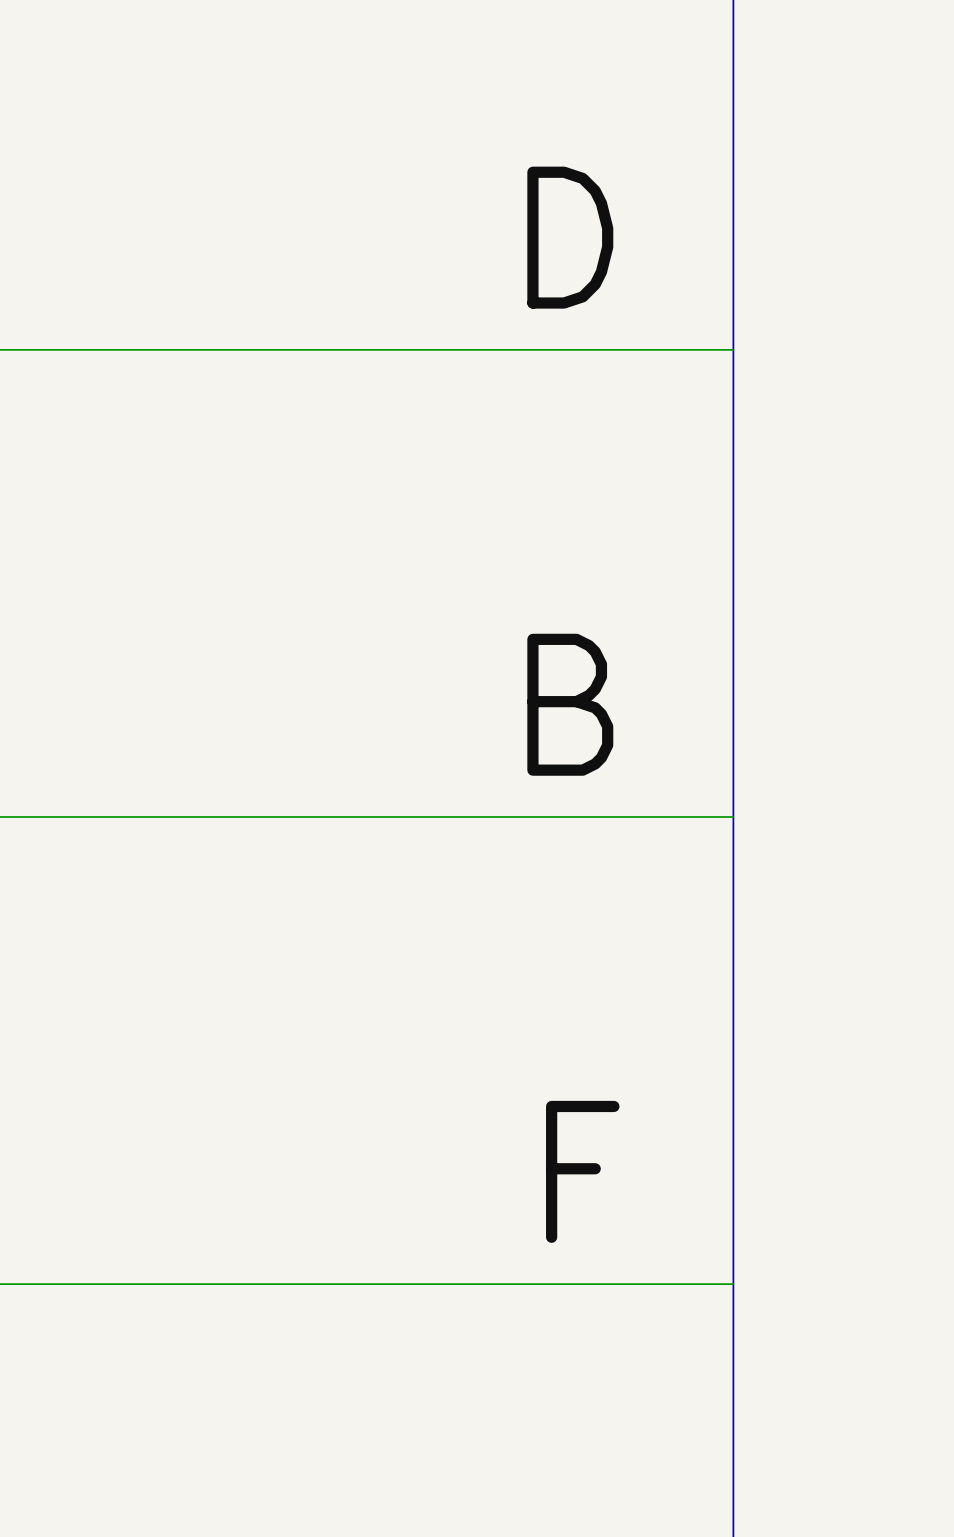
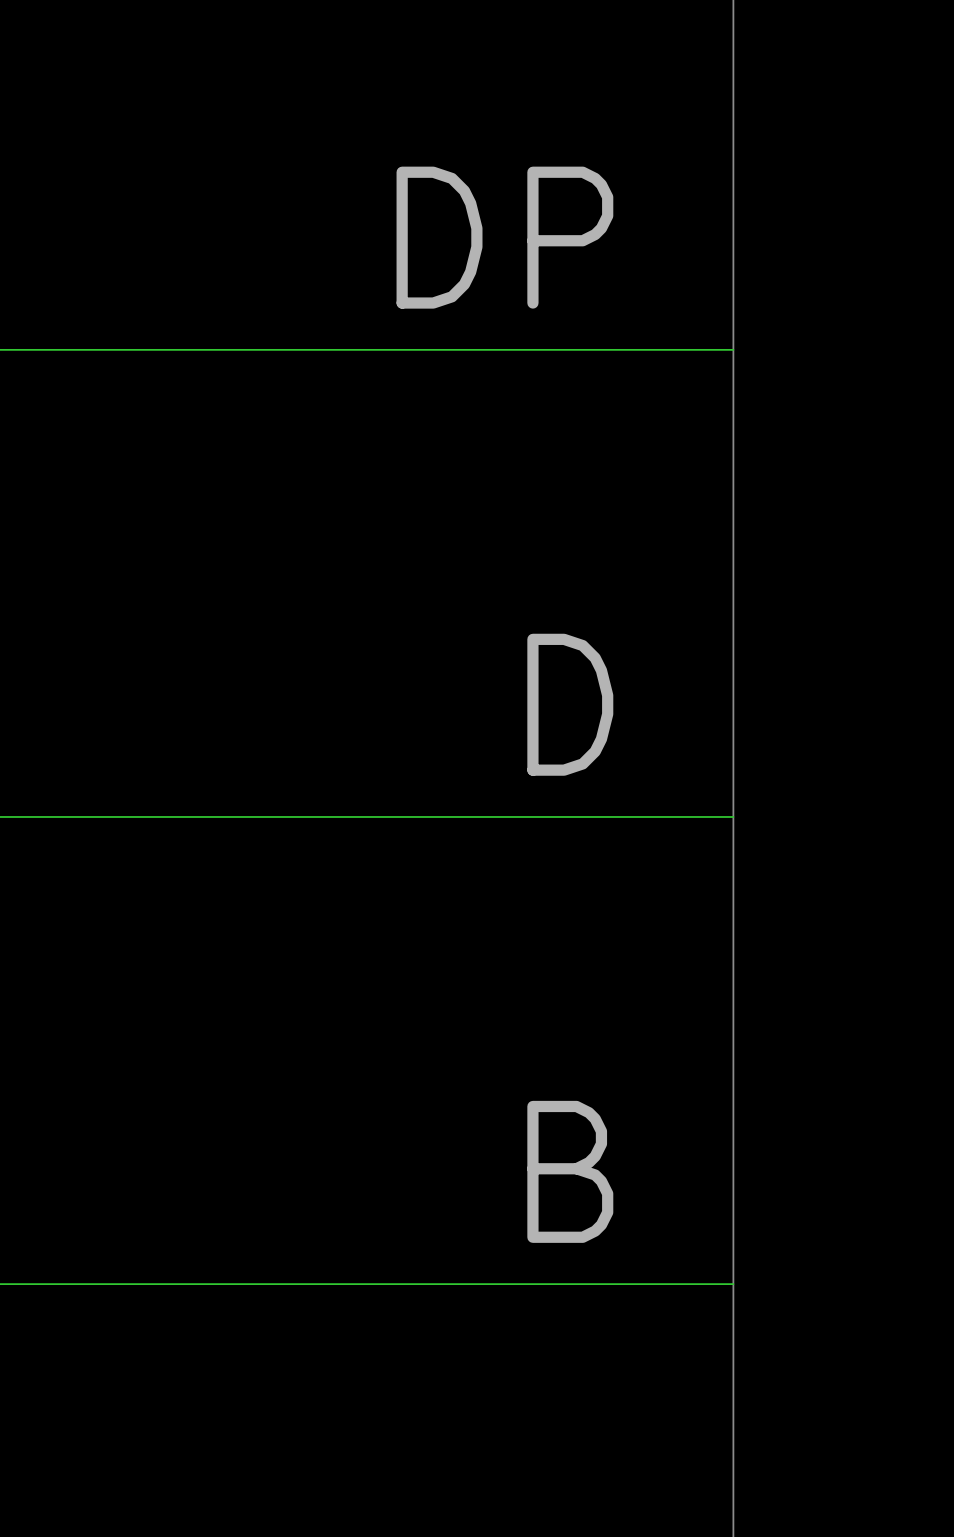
label: D (570, 237) -> DP (504, 237)
label: B (570, 704) -> D (570, 704)
label: F (582, 1171) -> B (570, 1171)

